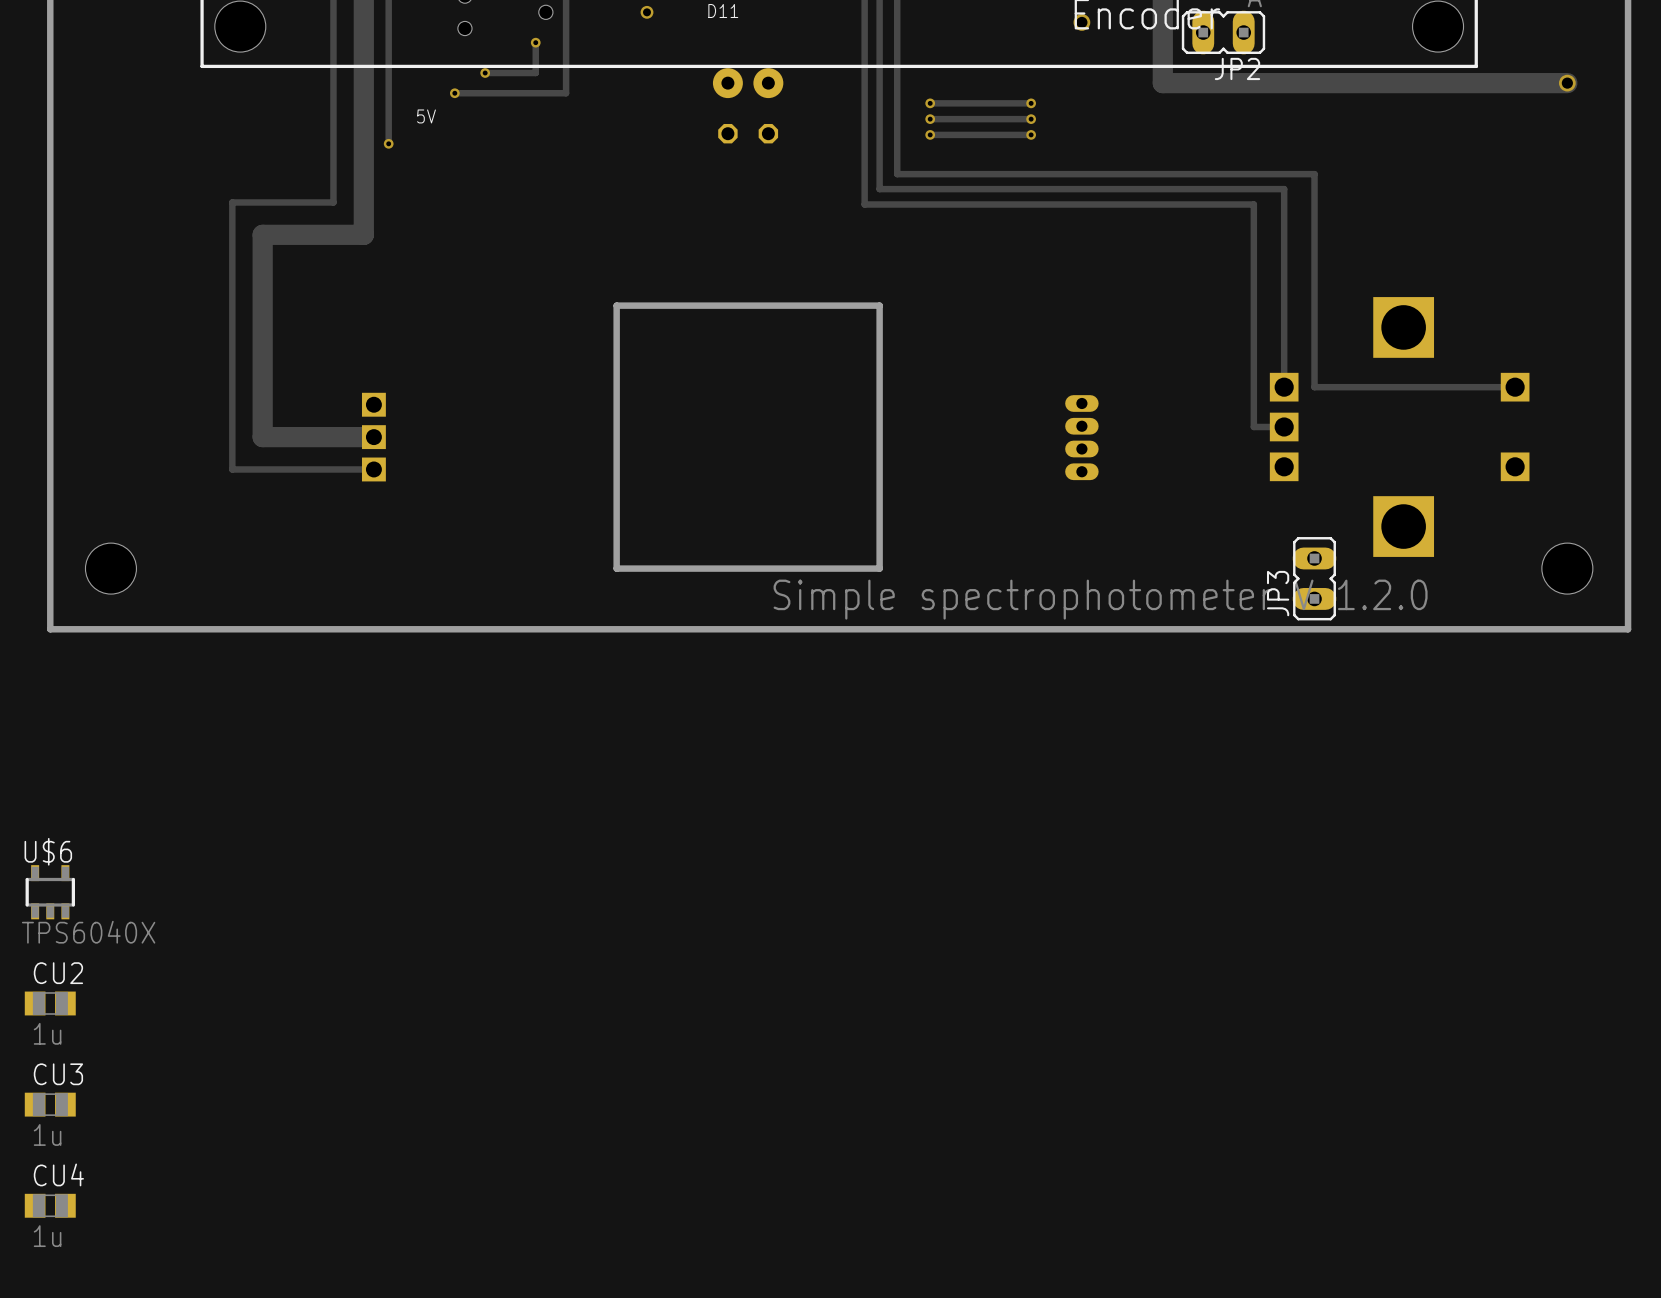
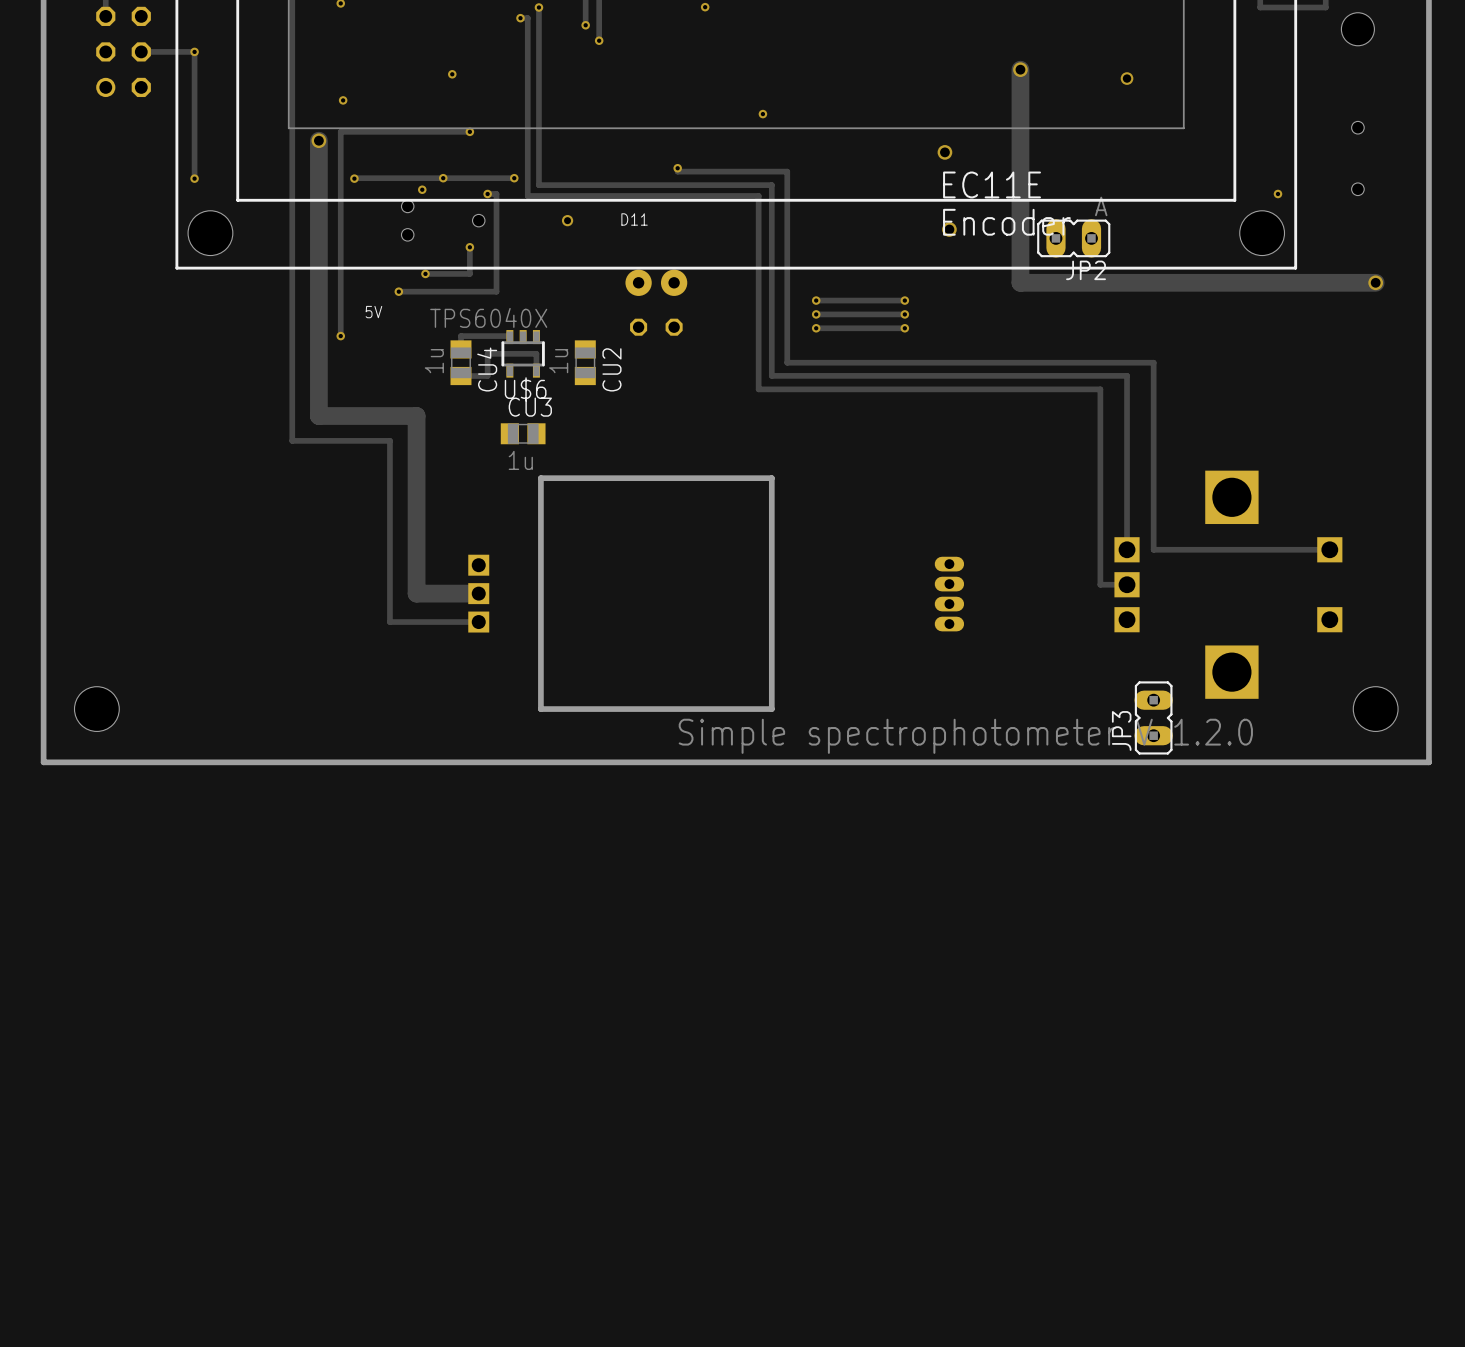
track: none -> (509, 337) (460, 336) (460, 349)
track: none -> (536, 370) (536, 353) (487, 353) (487, 376) (460, 376)
track: (333, 202) (232, 202) (232, 469) (373, 469) -> (292, 387) (292, 440) (389, 440) (389, 622) (478, 622)
track: (363, 234) (262, 234) (262, 437) (373, 437) -> (318, 416) (416, 416) (416, 593) (478, 593)
part position: (373, 437) -> (478, 593)
U$6 rotation: 0° (50, 892) -> 180° (523, 353)
U$6 position: (50, 892) -> (523, 353)
CU2 rotation: 0° (50, 1003) -> 90° clockwise (585, 362)
CU2 position: (50, 1003) -> (585, 362)
CU3 position: (50, 1104) -> (523, 433)
CU4 rotation: 0° (50, 1205) -> 90° clockwise (460, 362)
CU4 position: (50, 1205) -> (460, 362)

